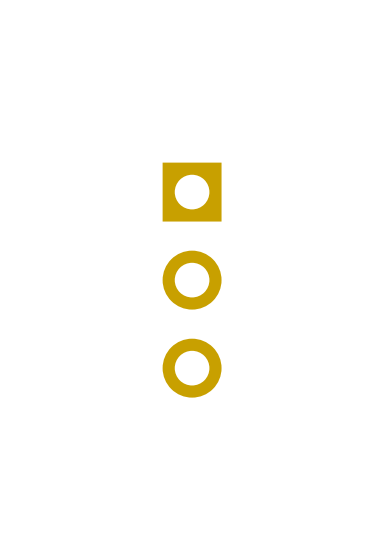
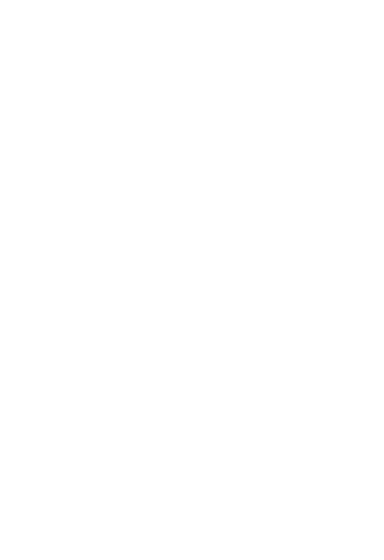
part: (192, 280) -> none

